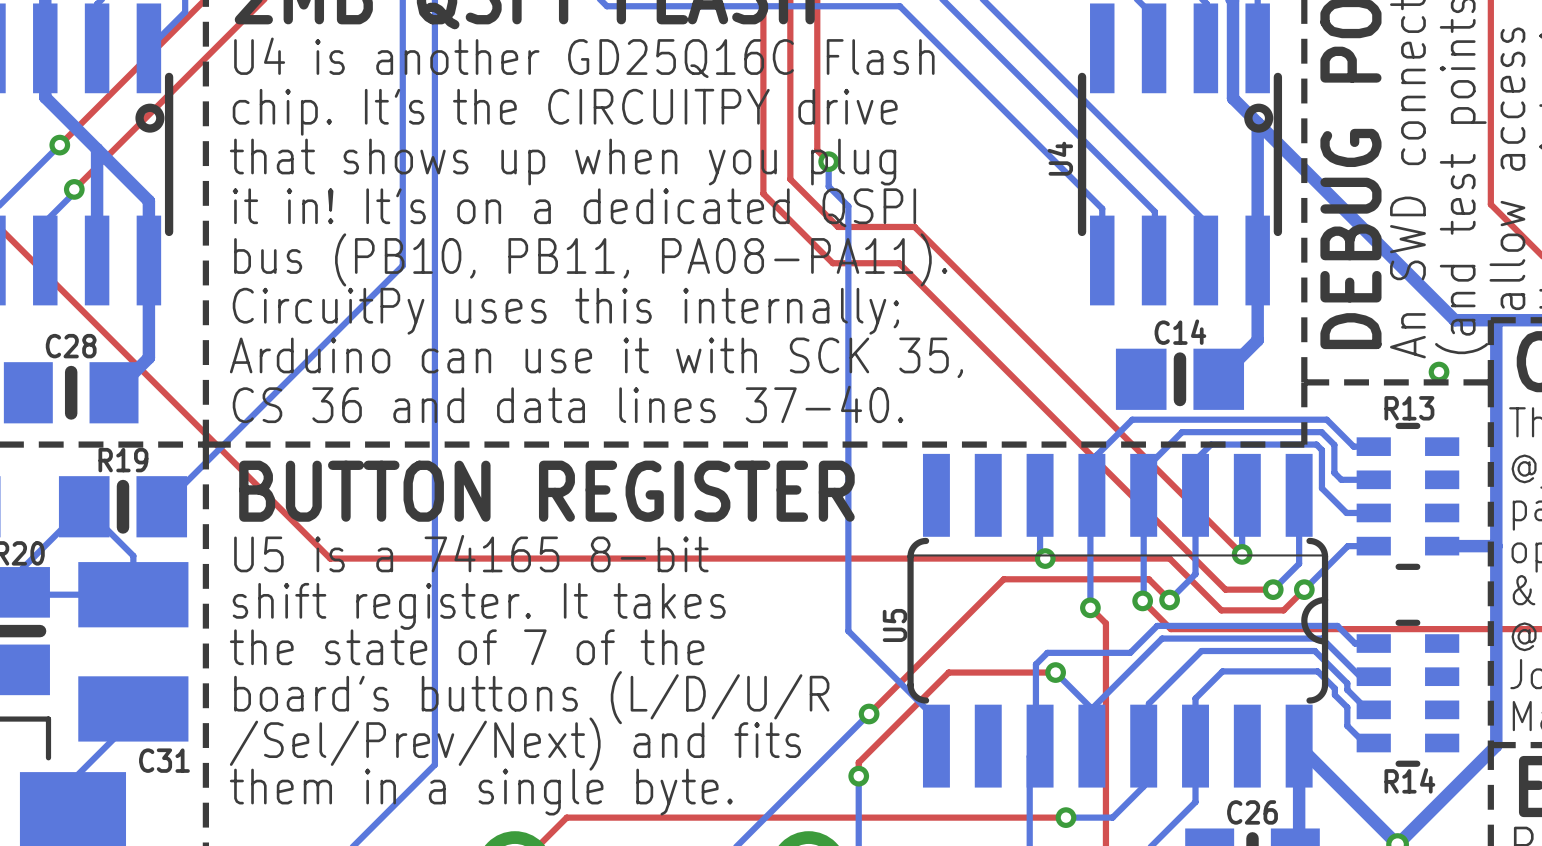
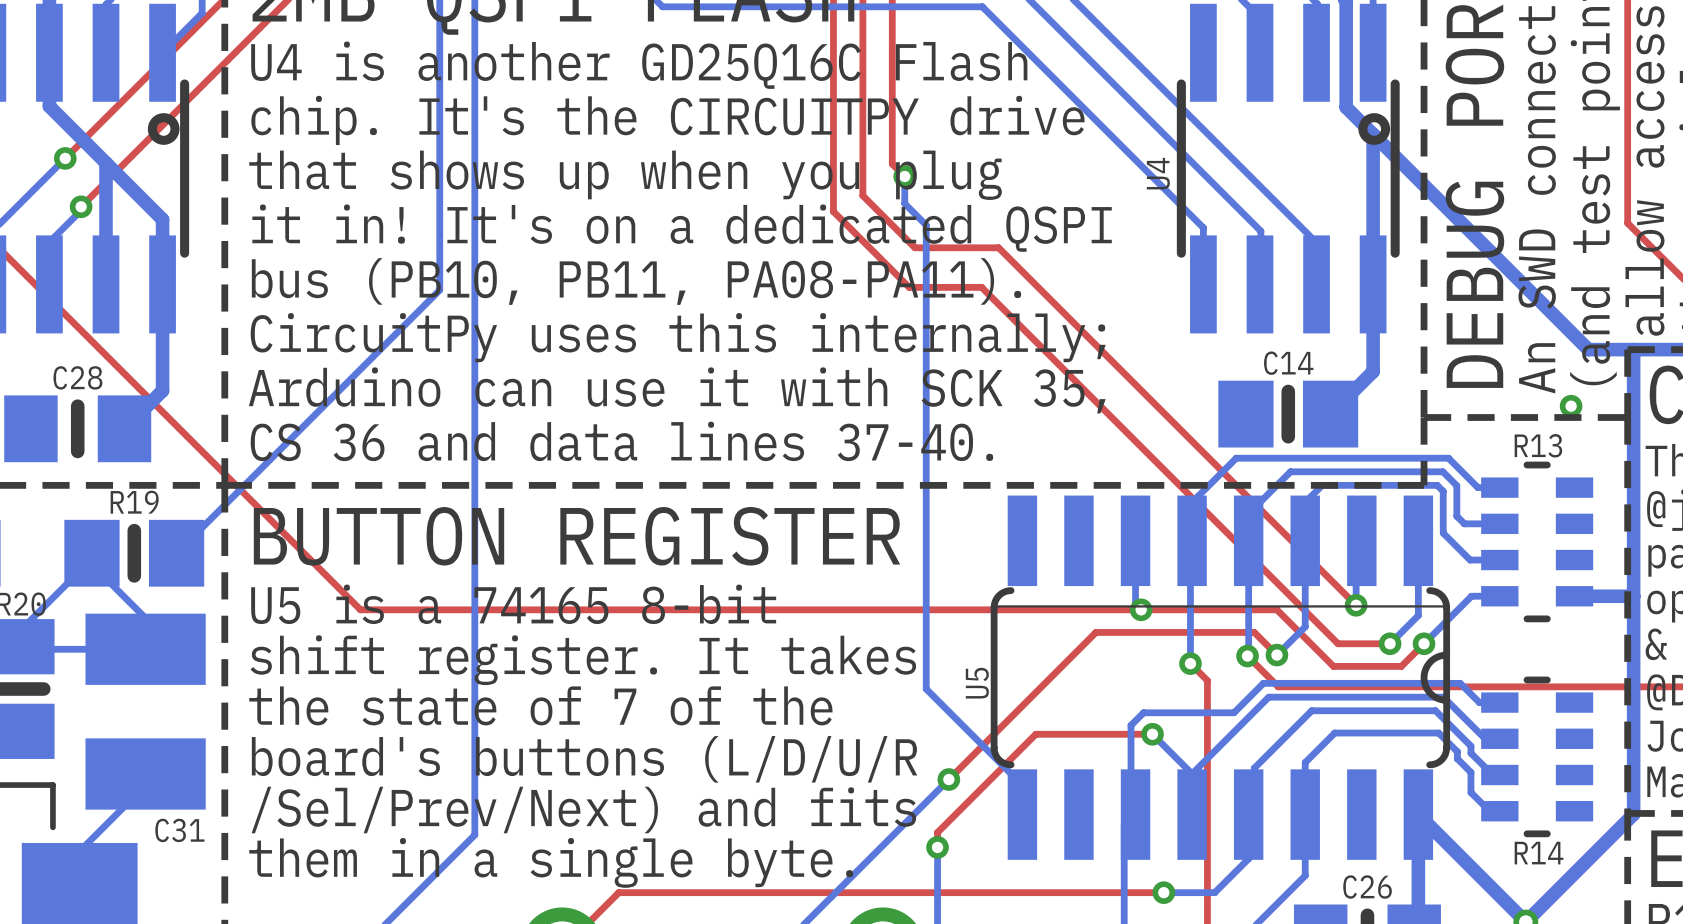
bottom track: none -> (91, 553) (91, 564) (145, 618)
bottom track: (133, 566) (133, 555) (84, 506) (21, 569) (21, 574) -> (91, 558) (23, 627)

